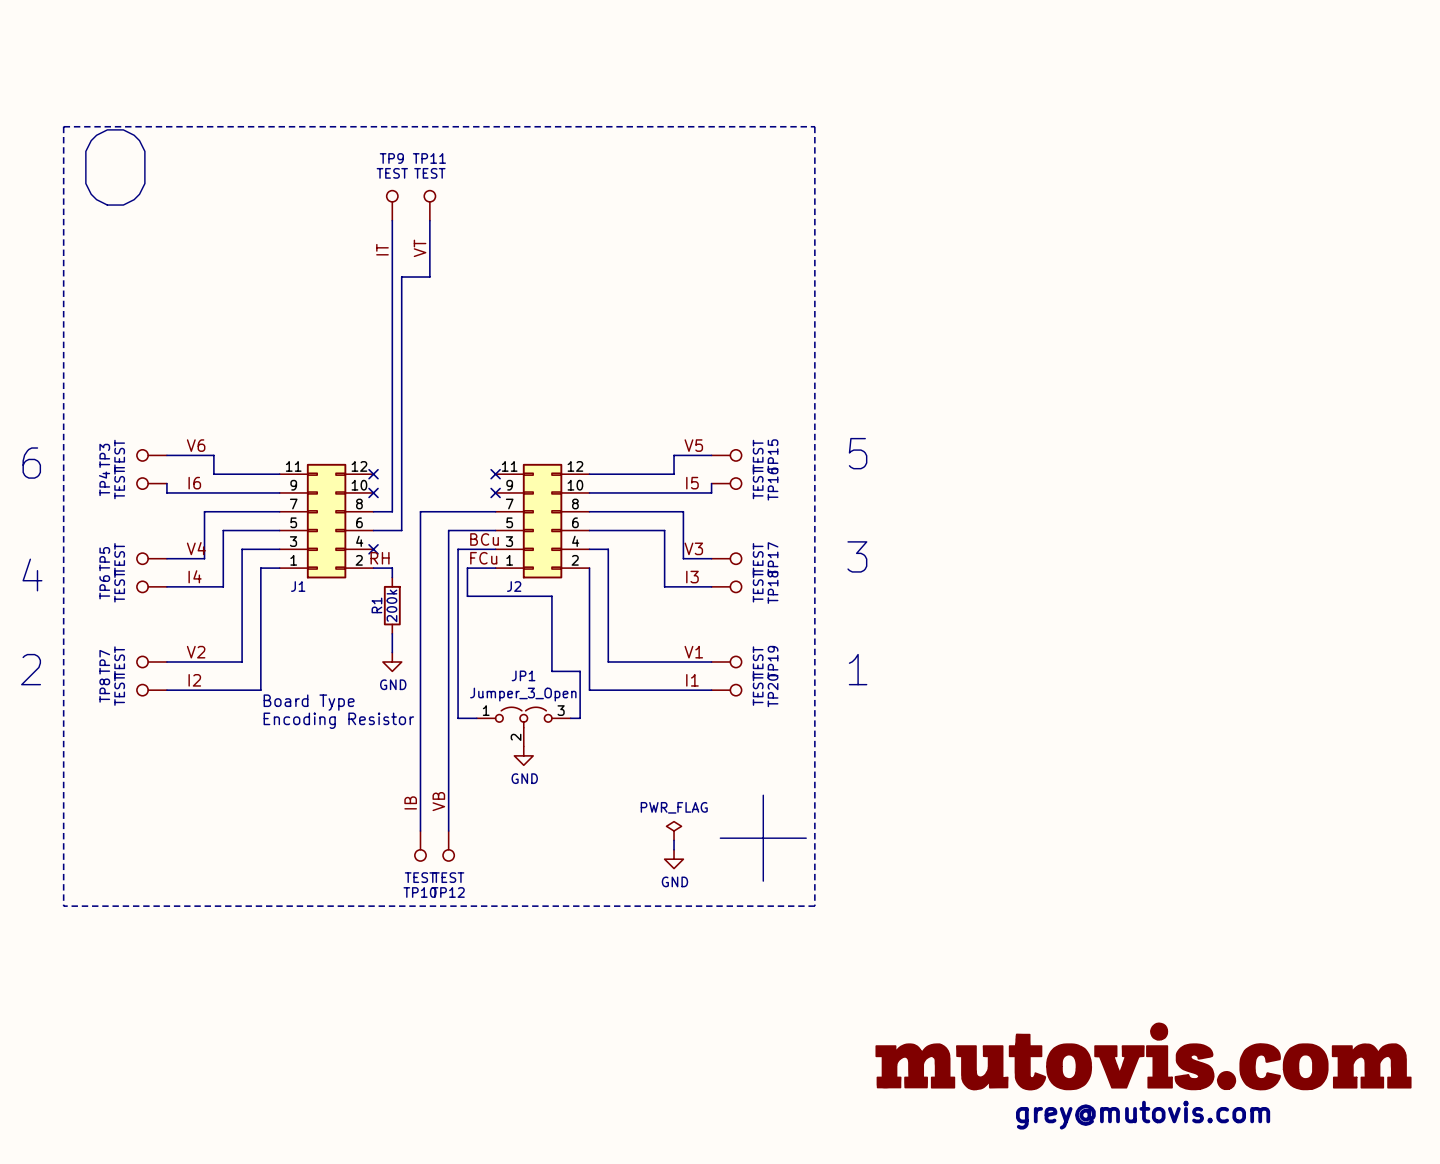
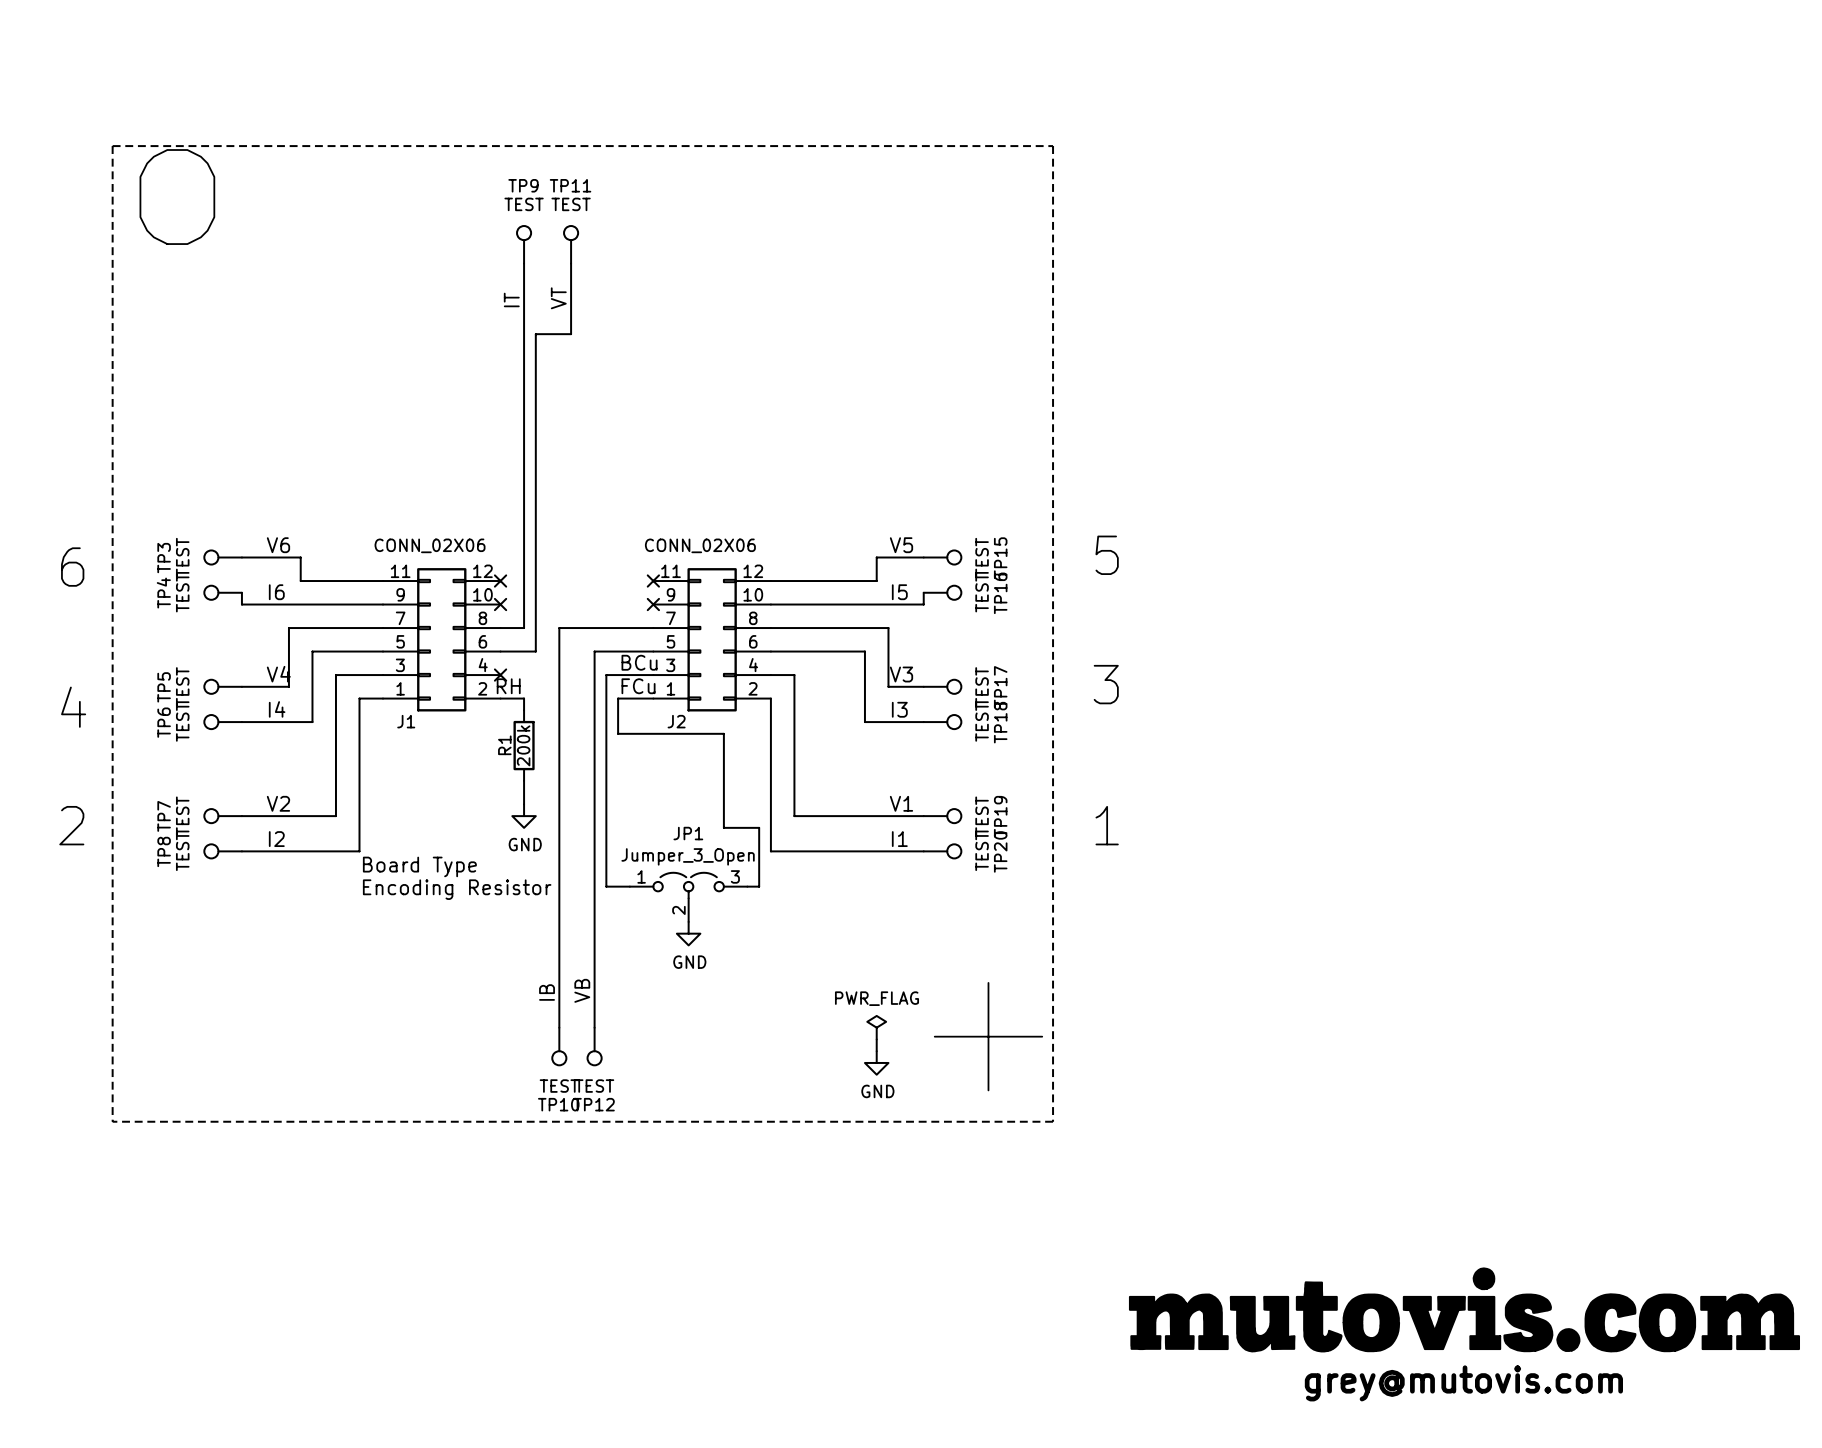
J1 value: none -> CONN_02X06 (430, 545)
J2 value: none -> CONN_02X06 (700, 545)

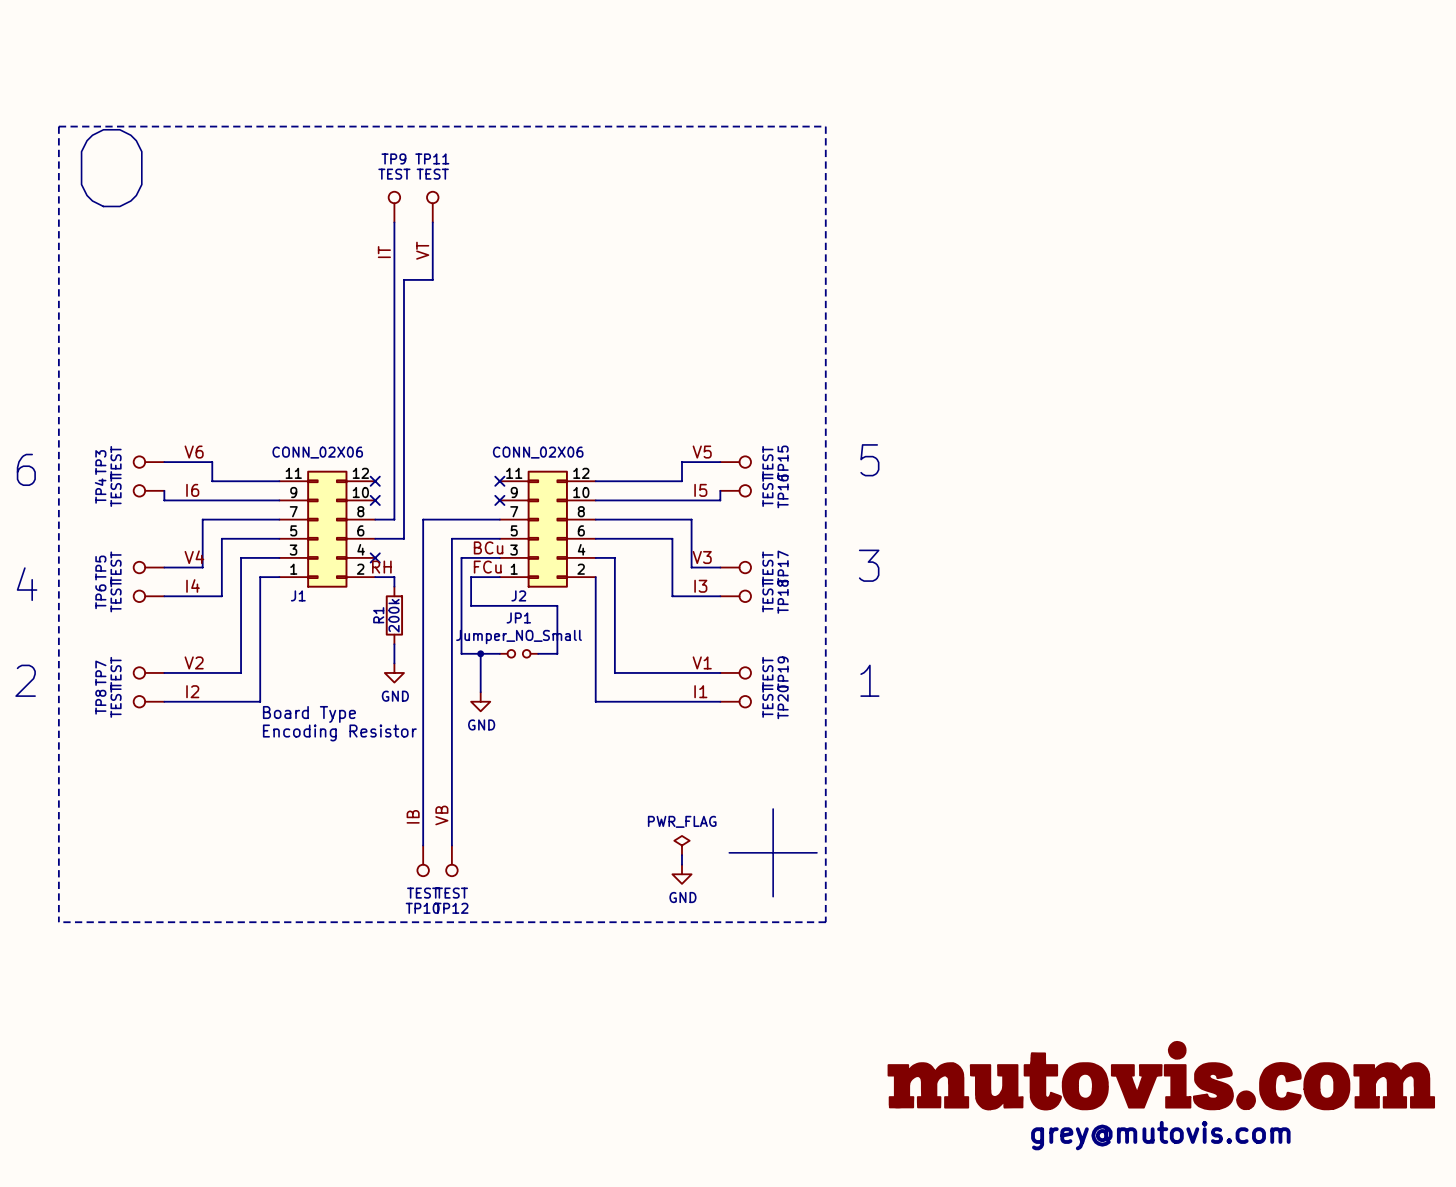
wire: (606, 792) (606, 886) (629, 886) -> (461, 653) (499, 653)
wire: none -> (480, 653) (480, 692)
junction: none -> (480, 653)
wire: (723, 792) (723, 827) (759, 827) (759, 886) (747, 886) -> (557, 653) (538, 653)
JP1 name position: JP1 (688, 833) -> JP1 (518, 617)
JP1 value: Jumper_3_Open (688, 856) -> Jumper_NO_Small (519, 637)
JP1 symbol: [629, 872, 748, 922] -> [499, 649, 539, 658]
power symbol position: GND (688, 933) -> GND (480, 701)

